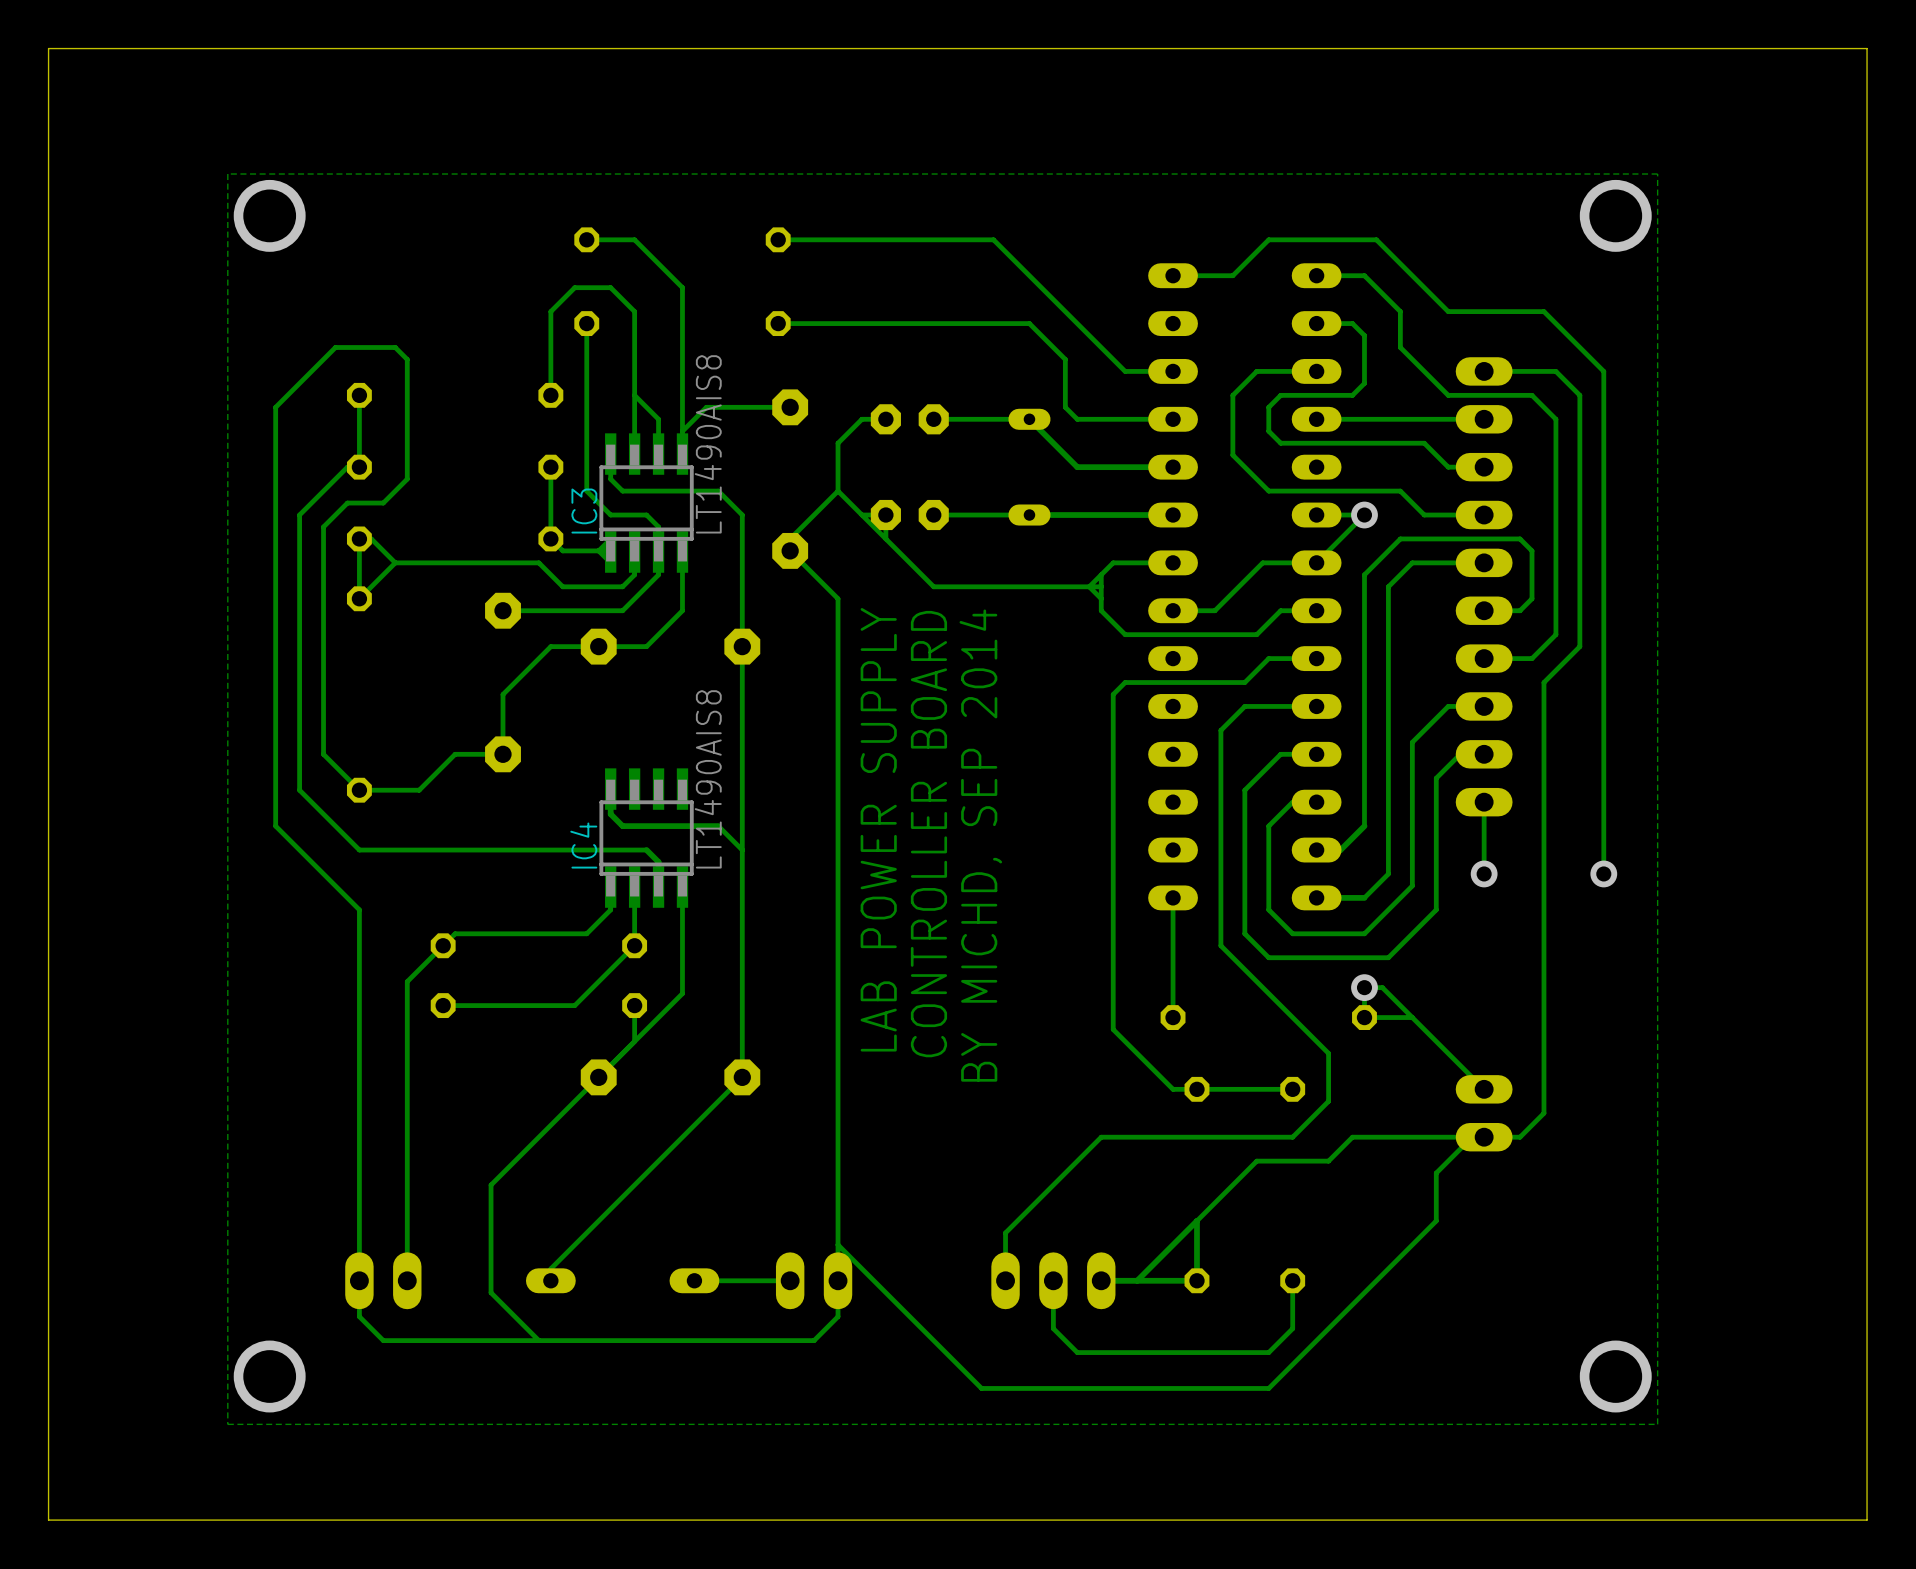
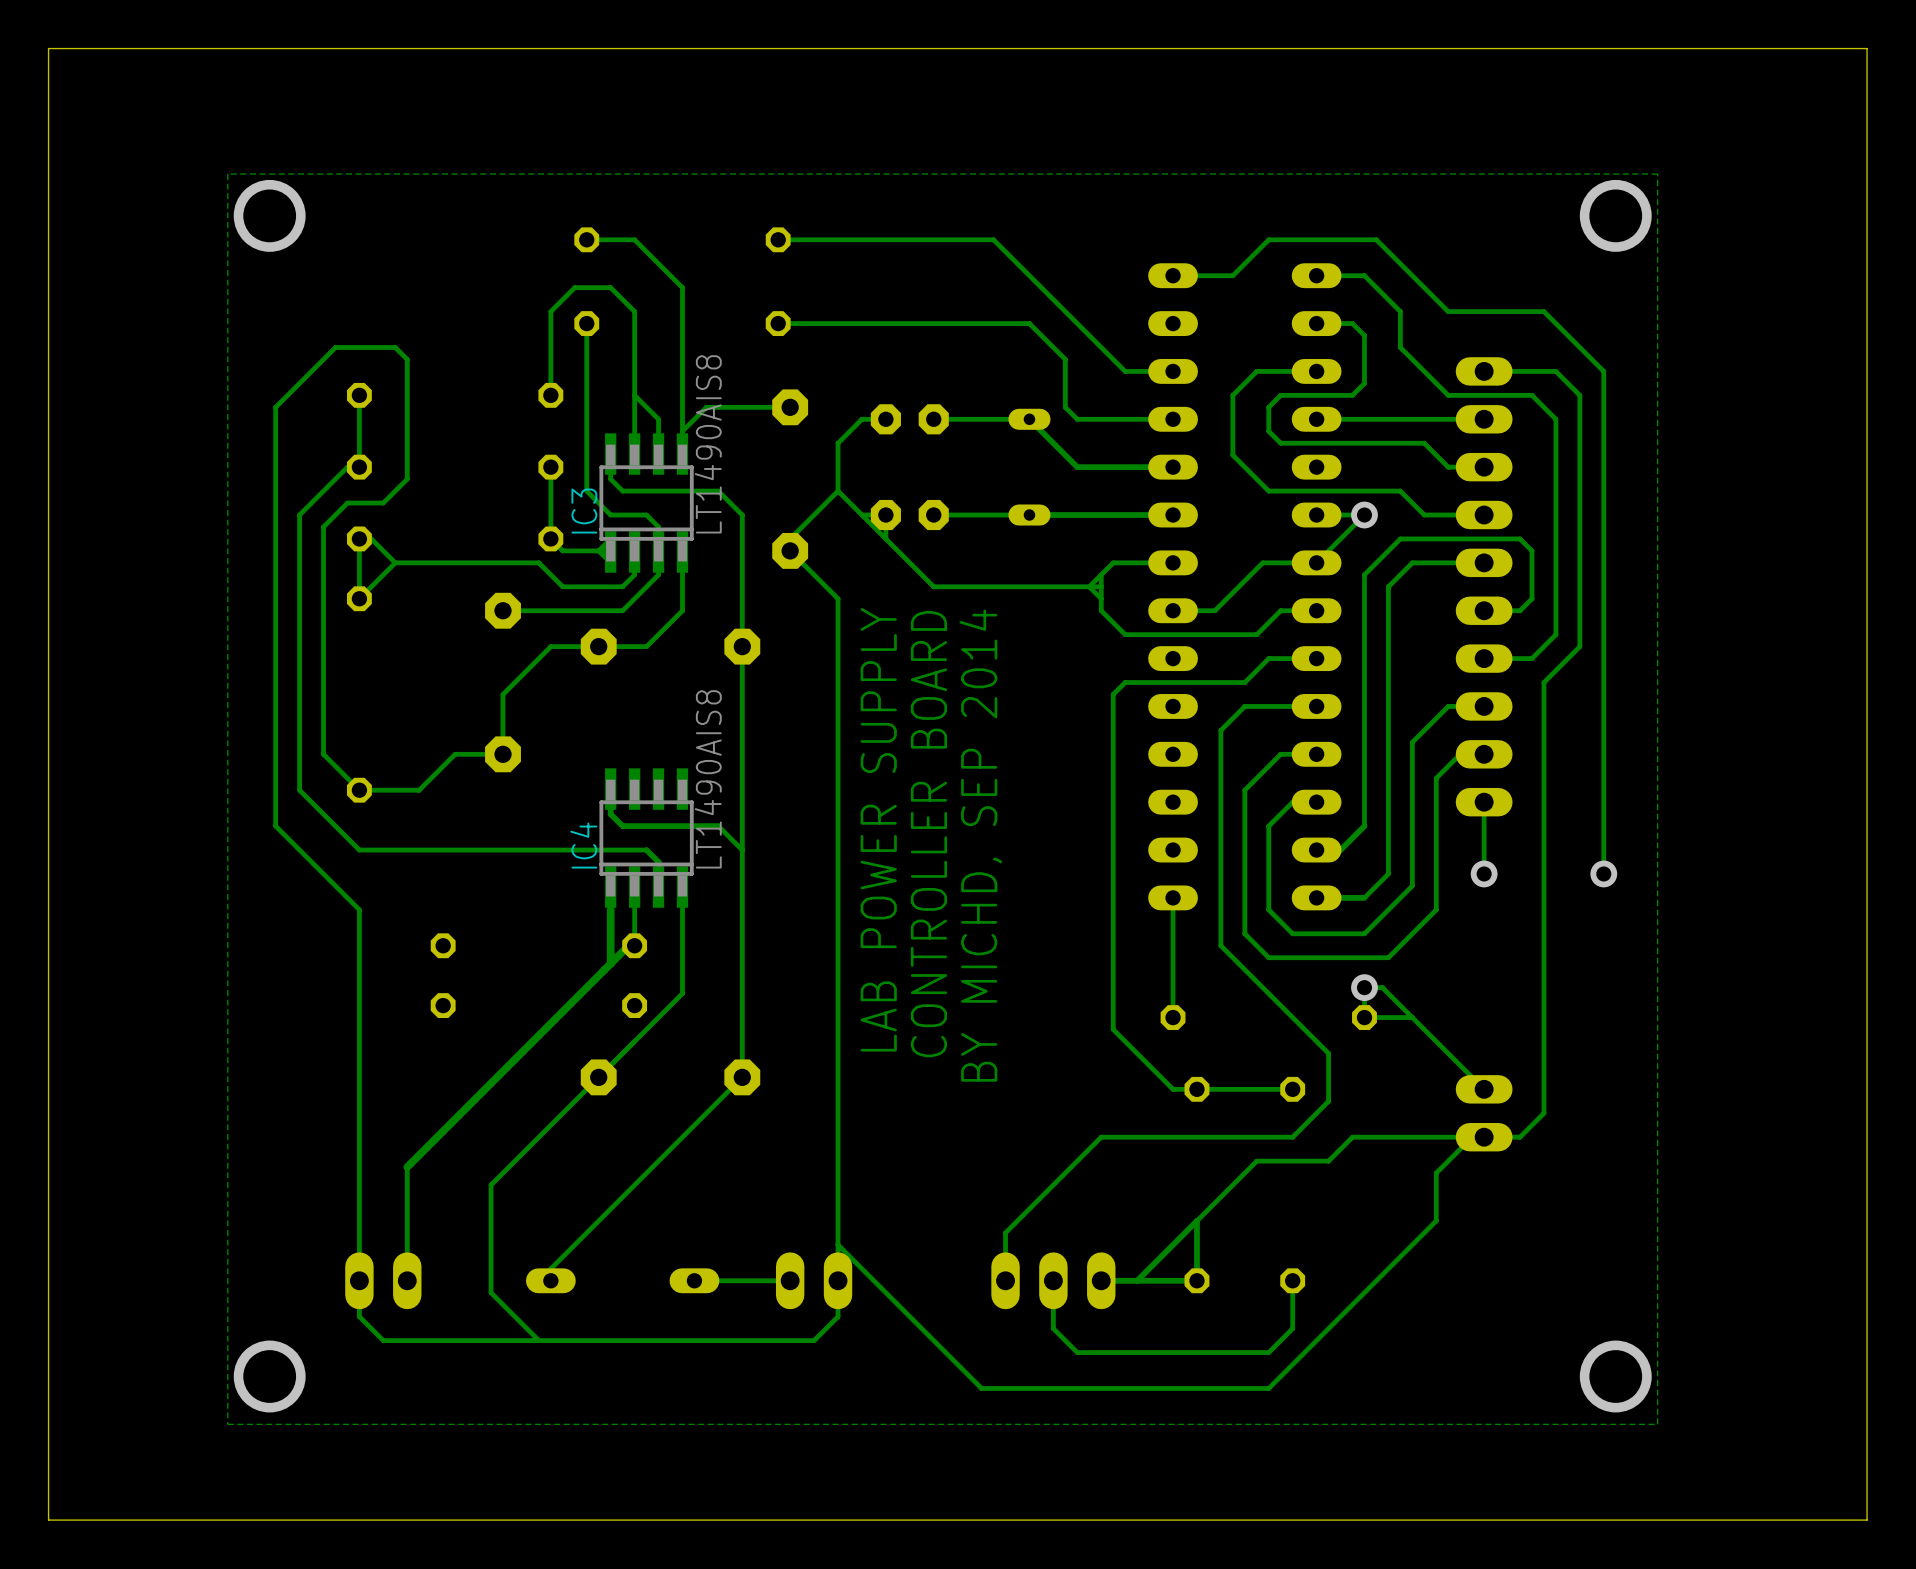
track: (610, 909) (586, 933) (455, 933) (407, 981) (407, 1167) -> (634, 939) (407, 1167)
track: none -> (610, 909) (610, 963)
track: (634, 939) (634, 945) (574, 1005) (443, 1005) -> none
track: (634, 1005) (634, 1041) -> none

